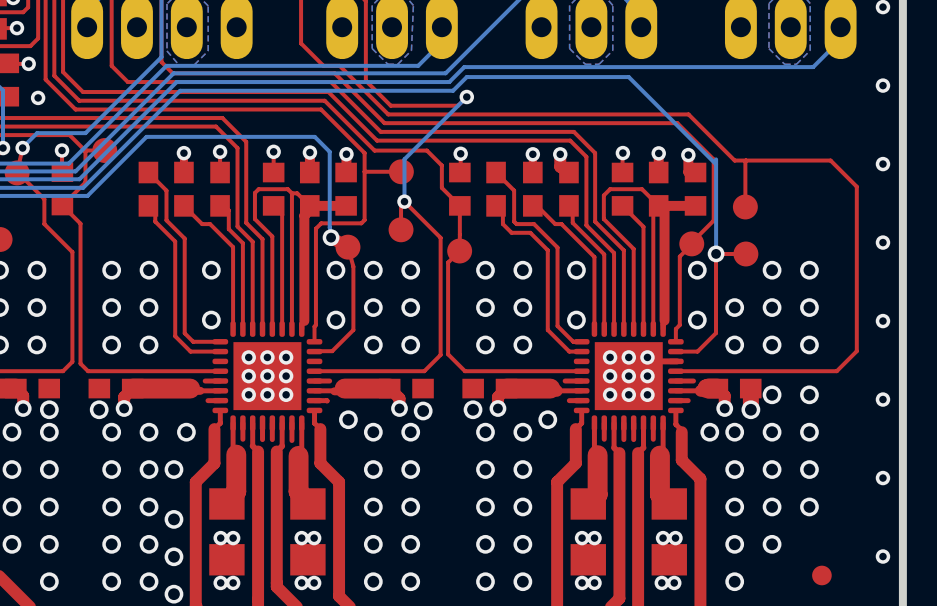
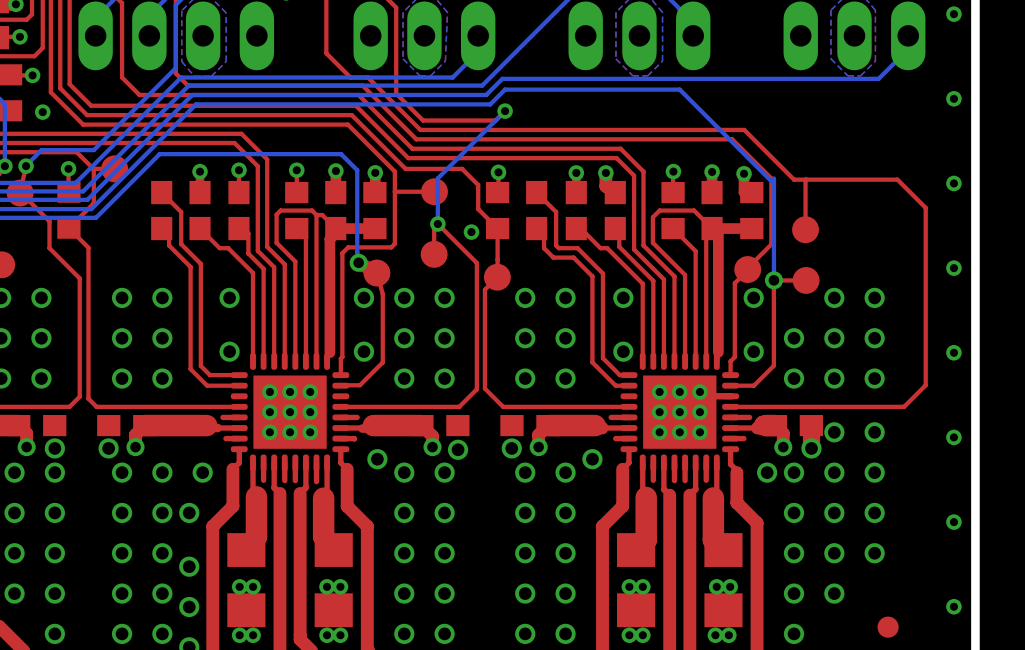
via: none -> (471, 232)

